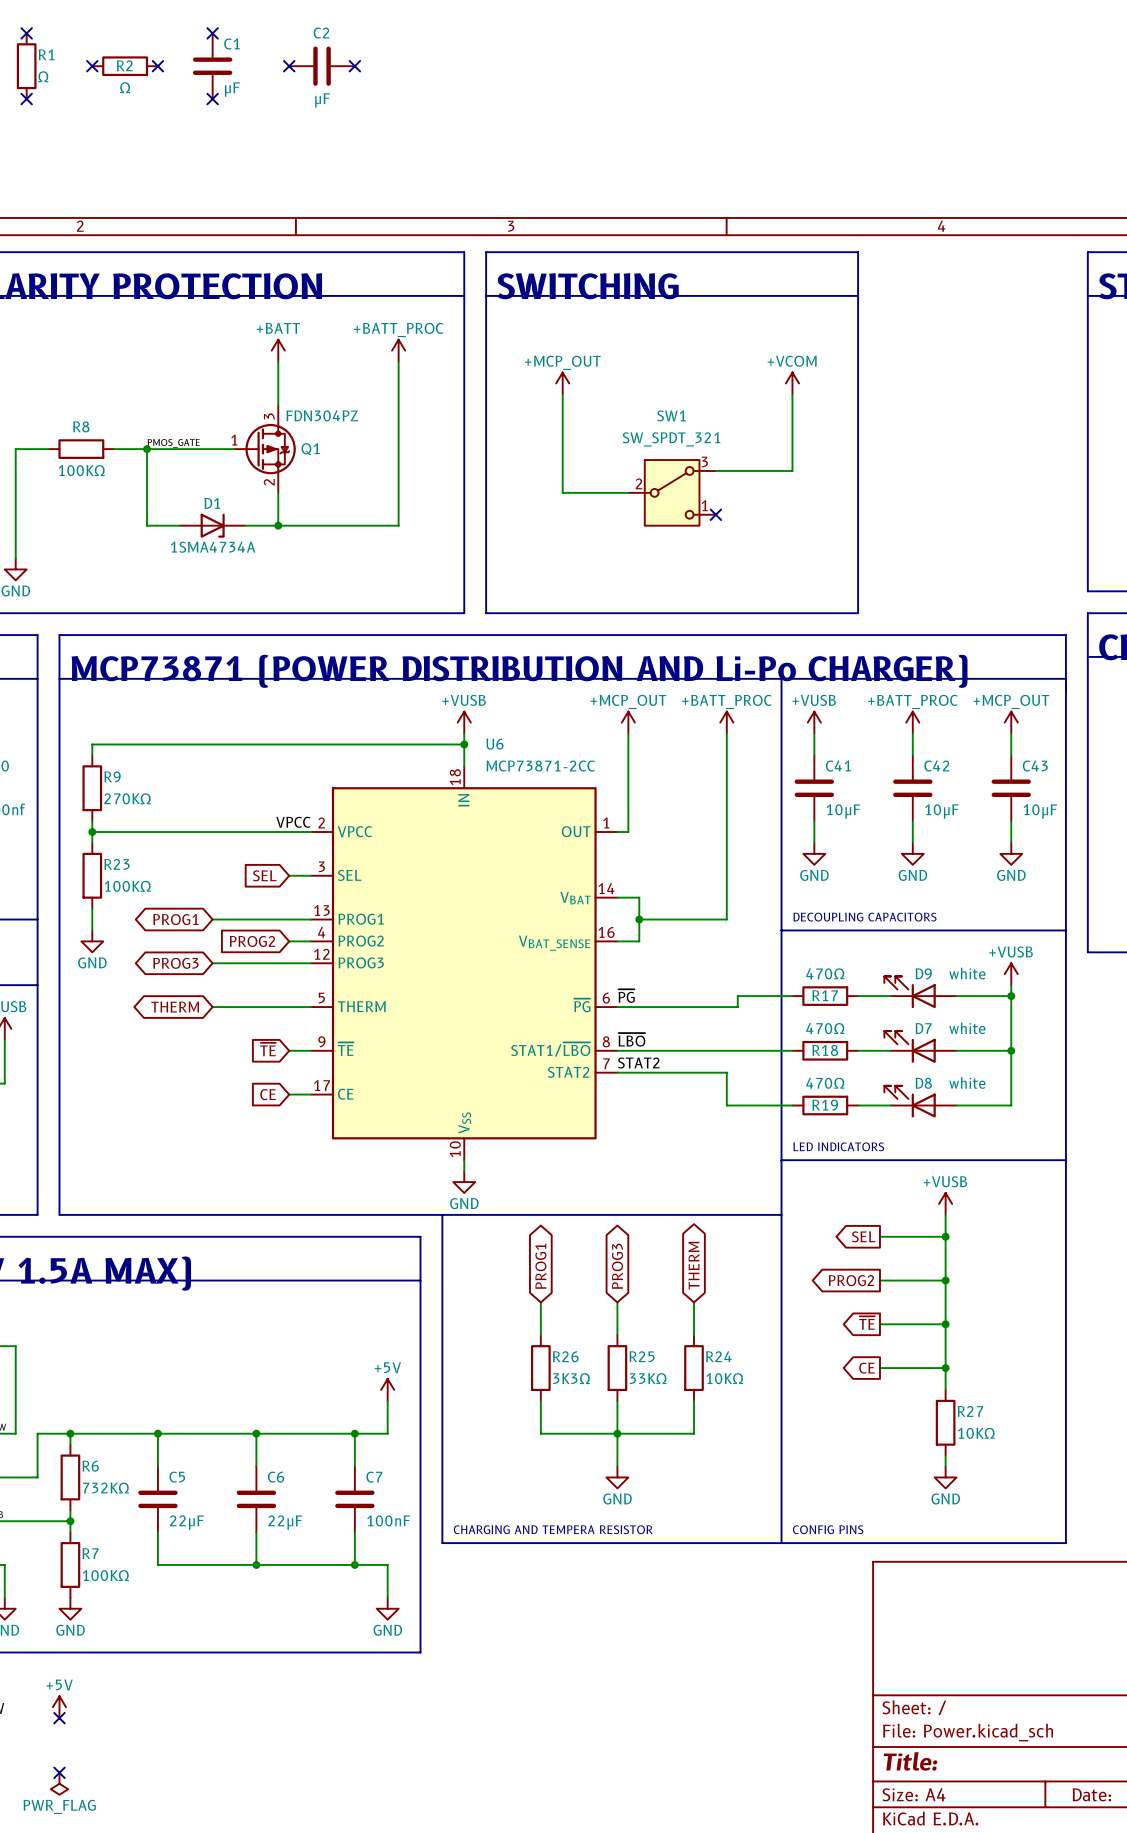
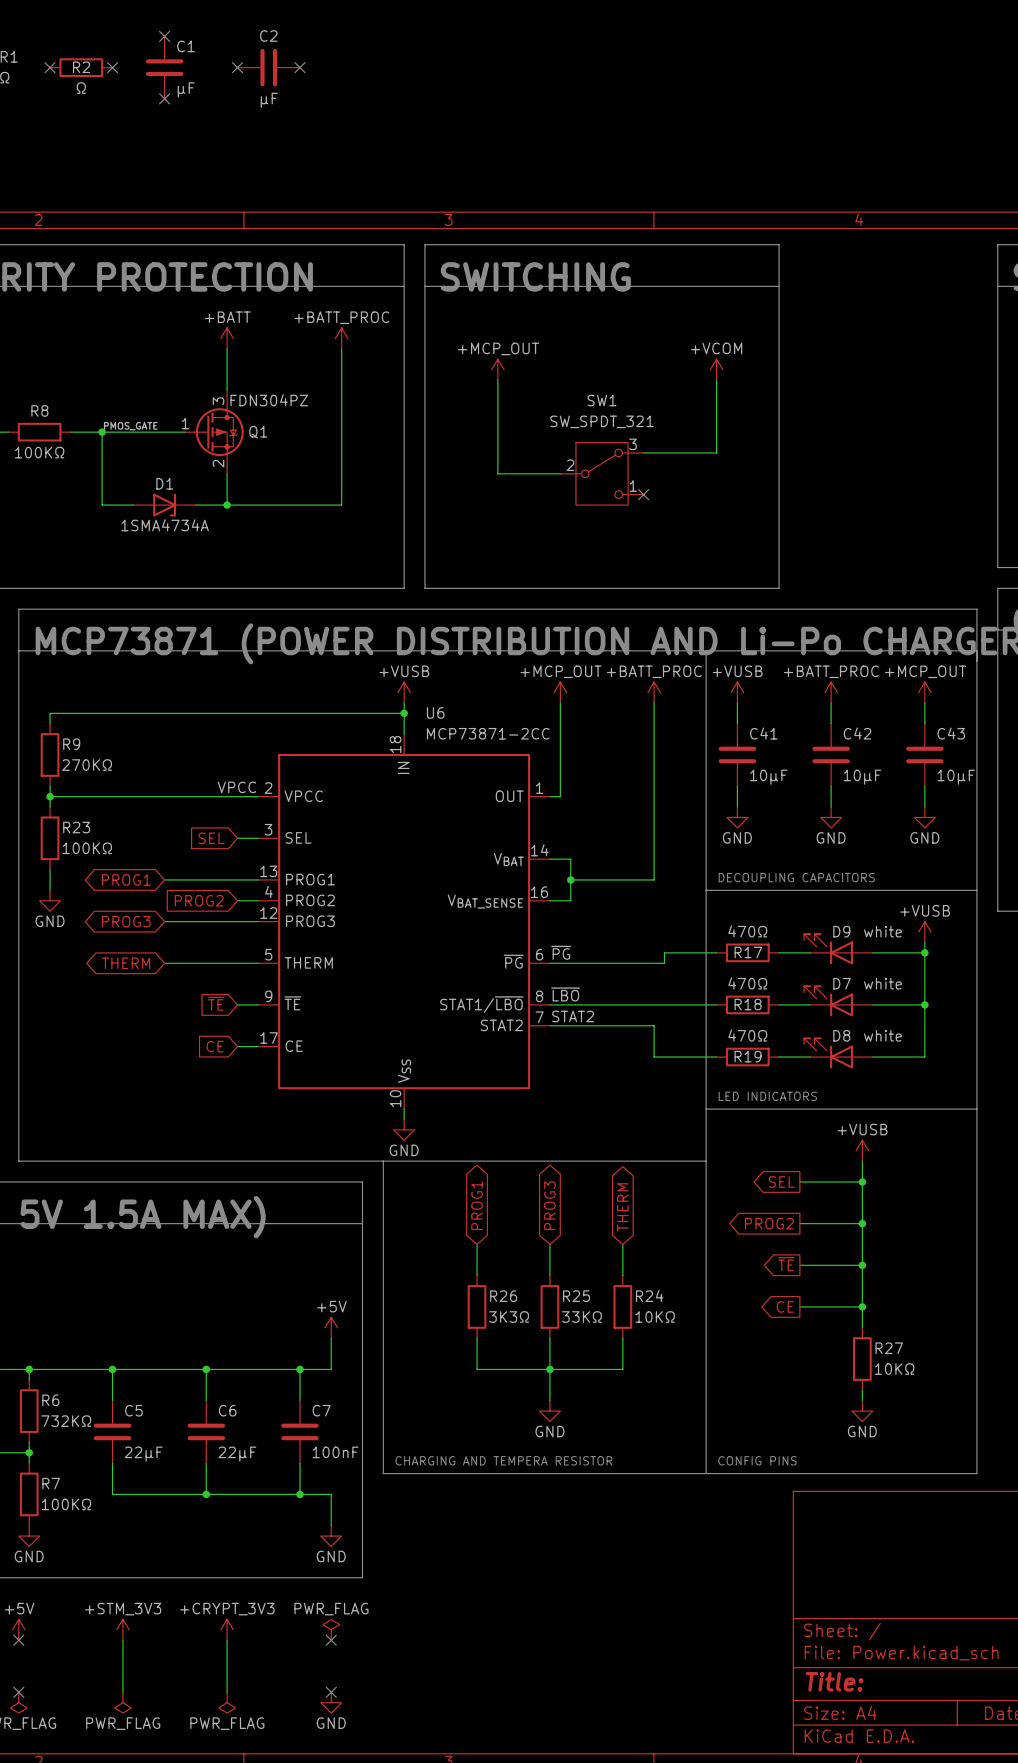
power symbol: none -> +STM_3V3 (122, 1629)
power symbol: none -> +CRYPT_3V3 (227, 1629)
power symbol: none -> PWR_FLAG (331, 1629)
wire: none -> (122, 1640) (122, 1692)
wire: none -> (227, 1640) (227, 1692)
no-connect mark: none -> (331, 1640)
no-connect mark: none -> (331, 1692)
power symbol: none -> PWR_FLAG (122, 1702)
power symbol: none -> PWR_FLAG (227, 1702)
power symbol: none -> GND (331, 1702)

